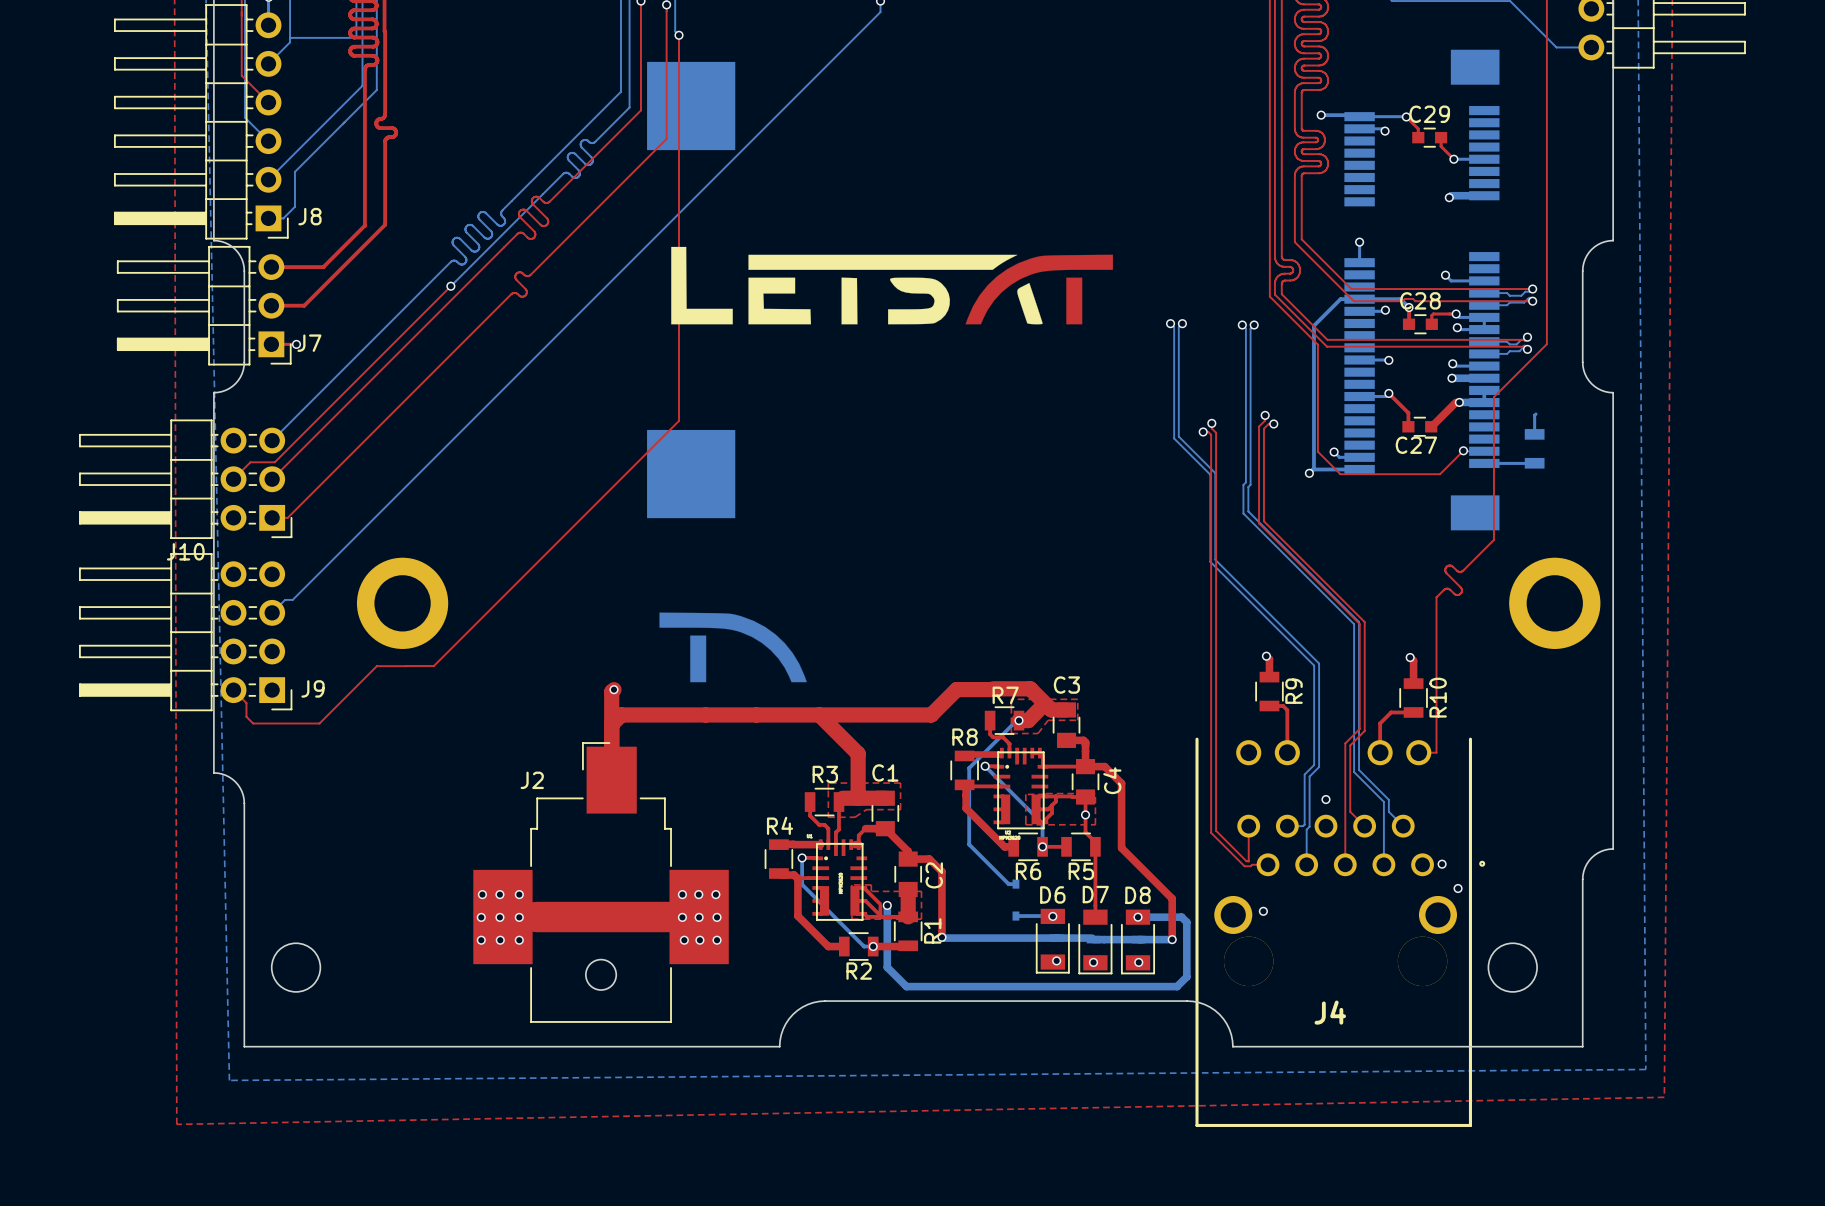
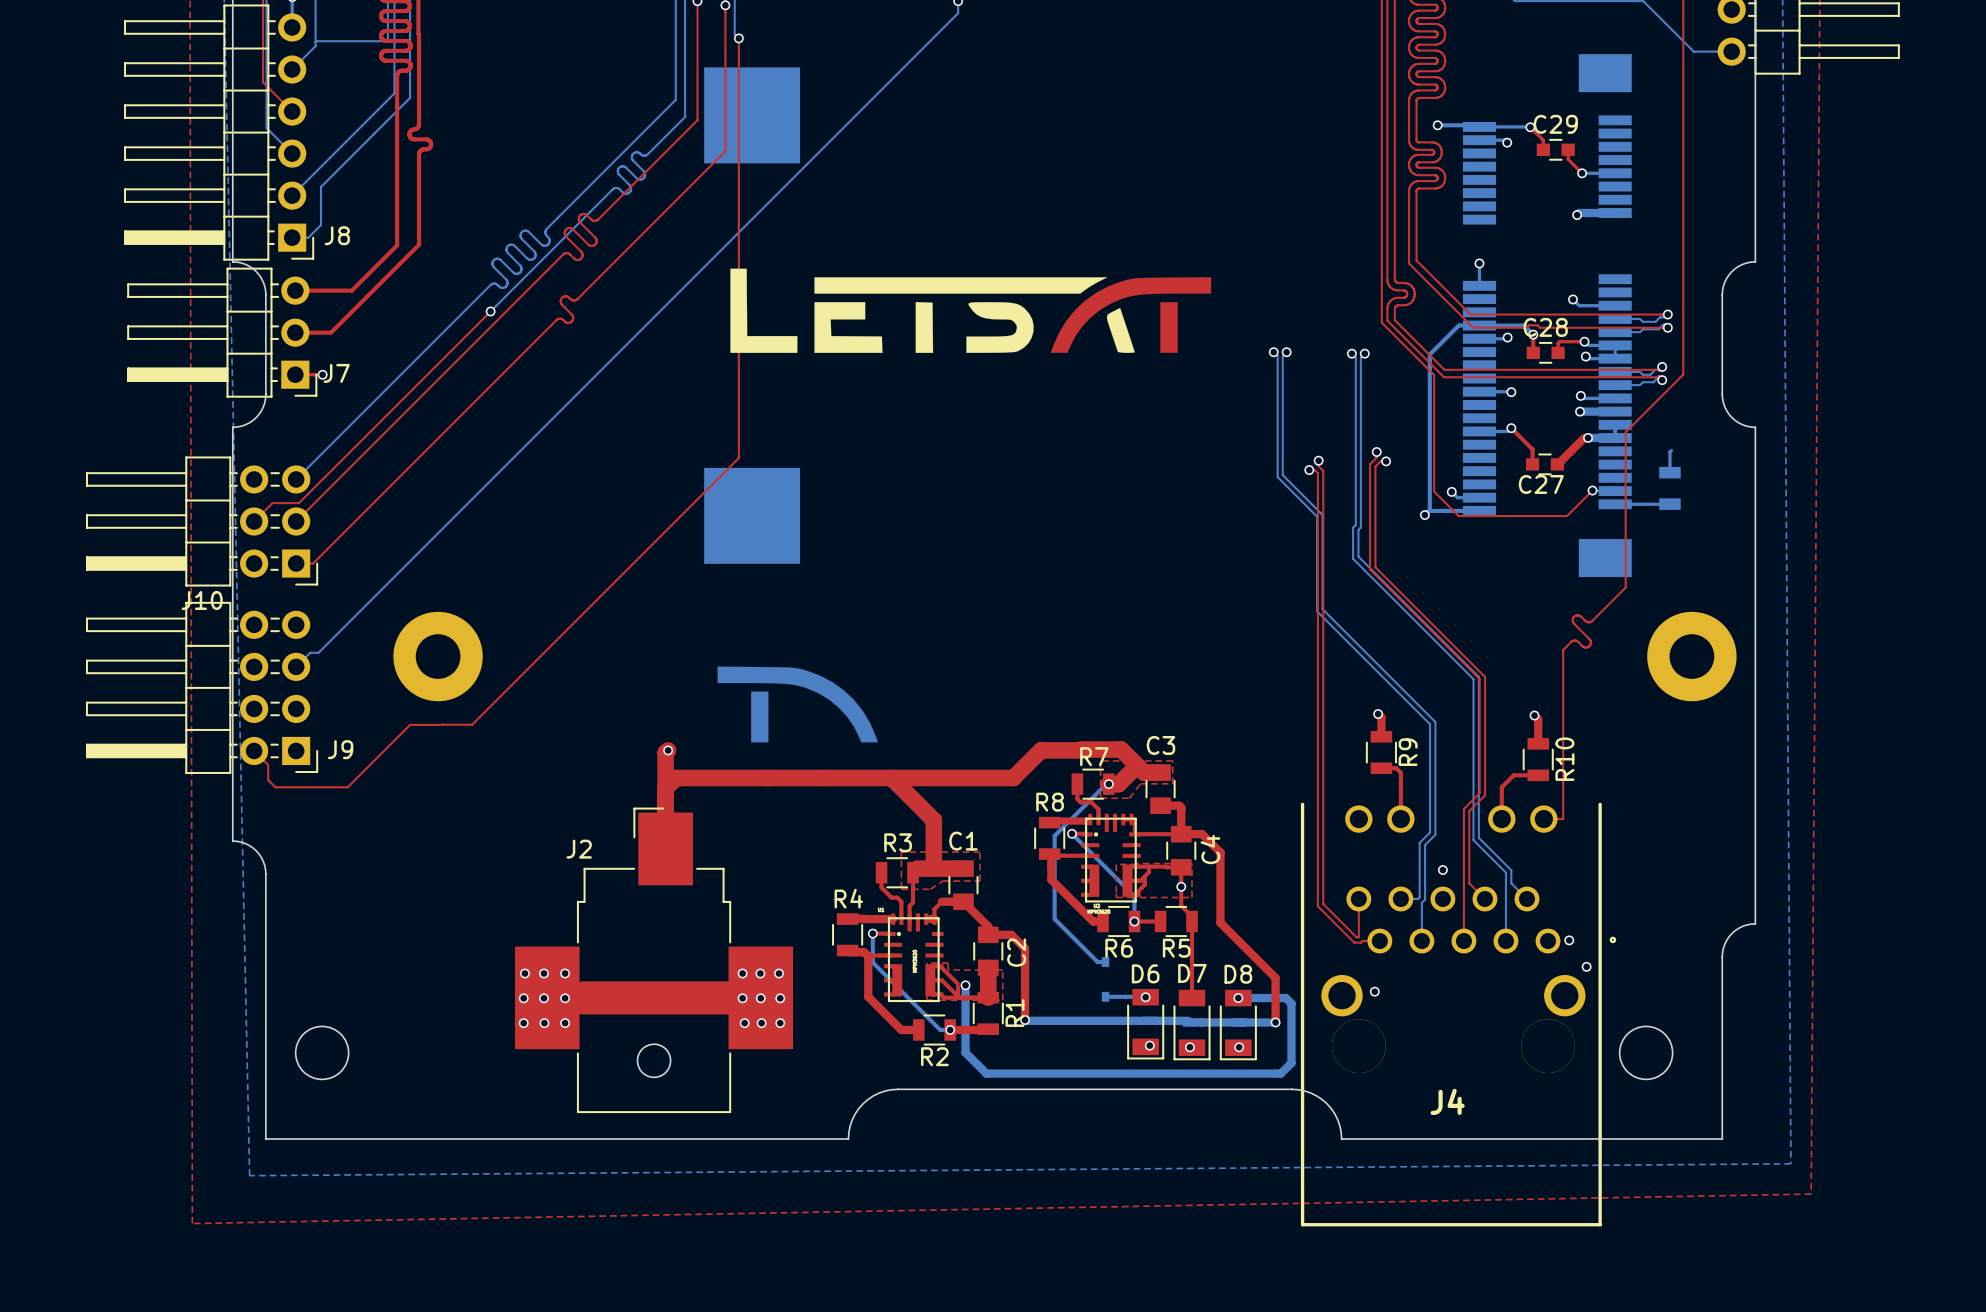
part footprint: [356, 557, 449, 649] -> [393, 611, 483, 702]
part footprint: [1509, 557, 1601, 649] -> [1647, 611, 1737, 702]

